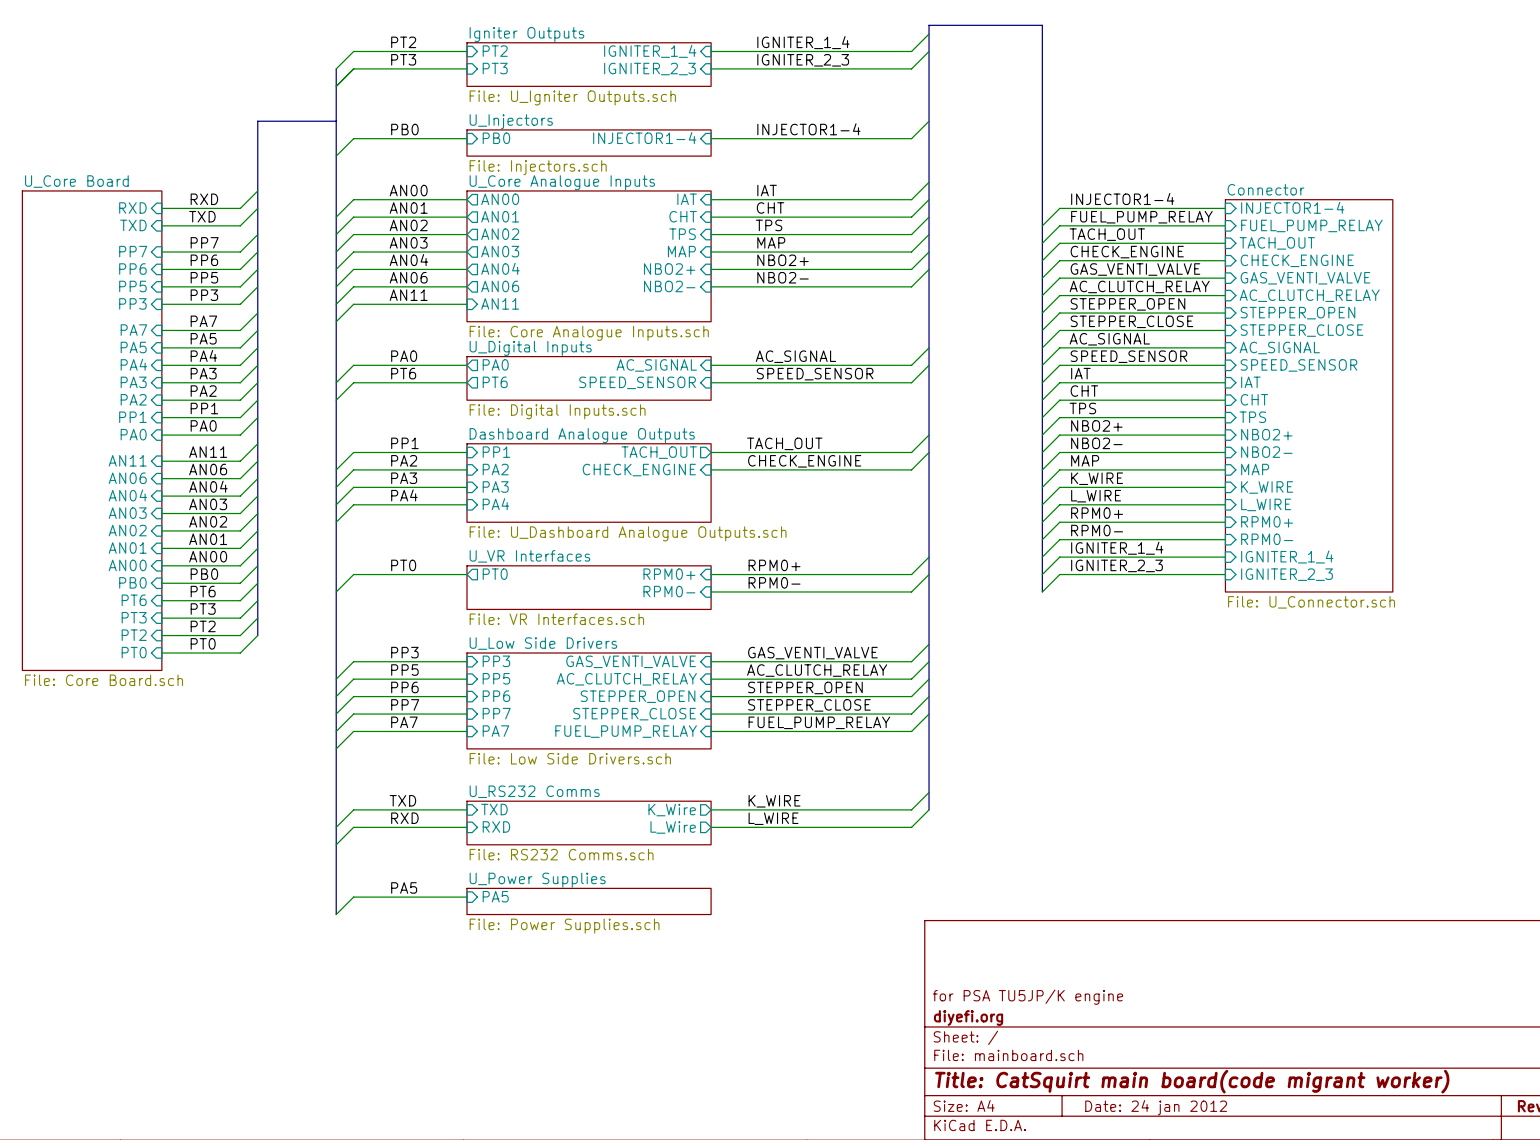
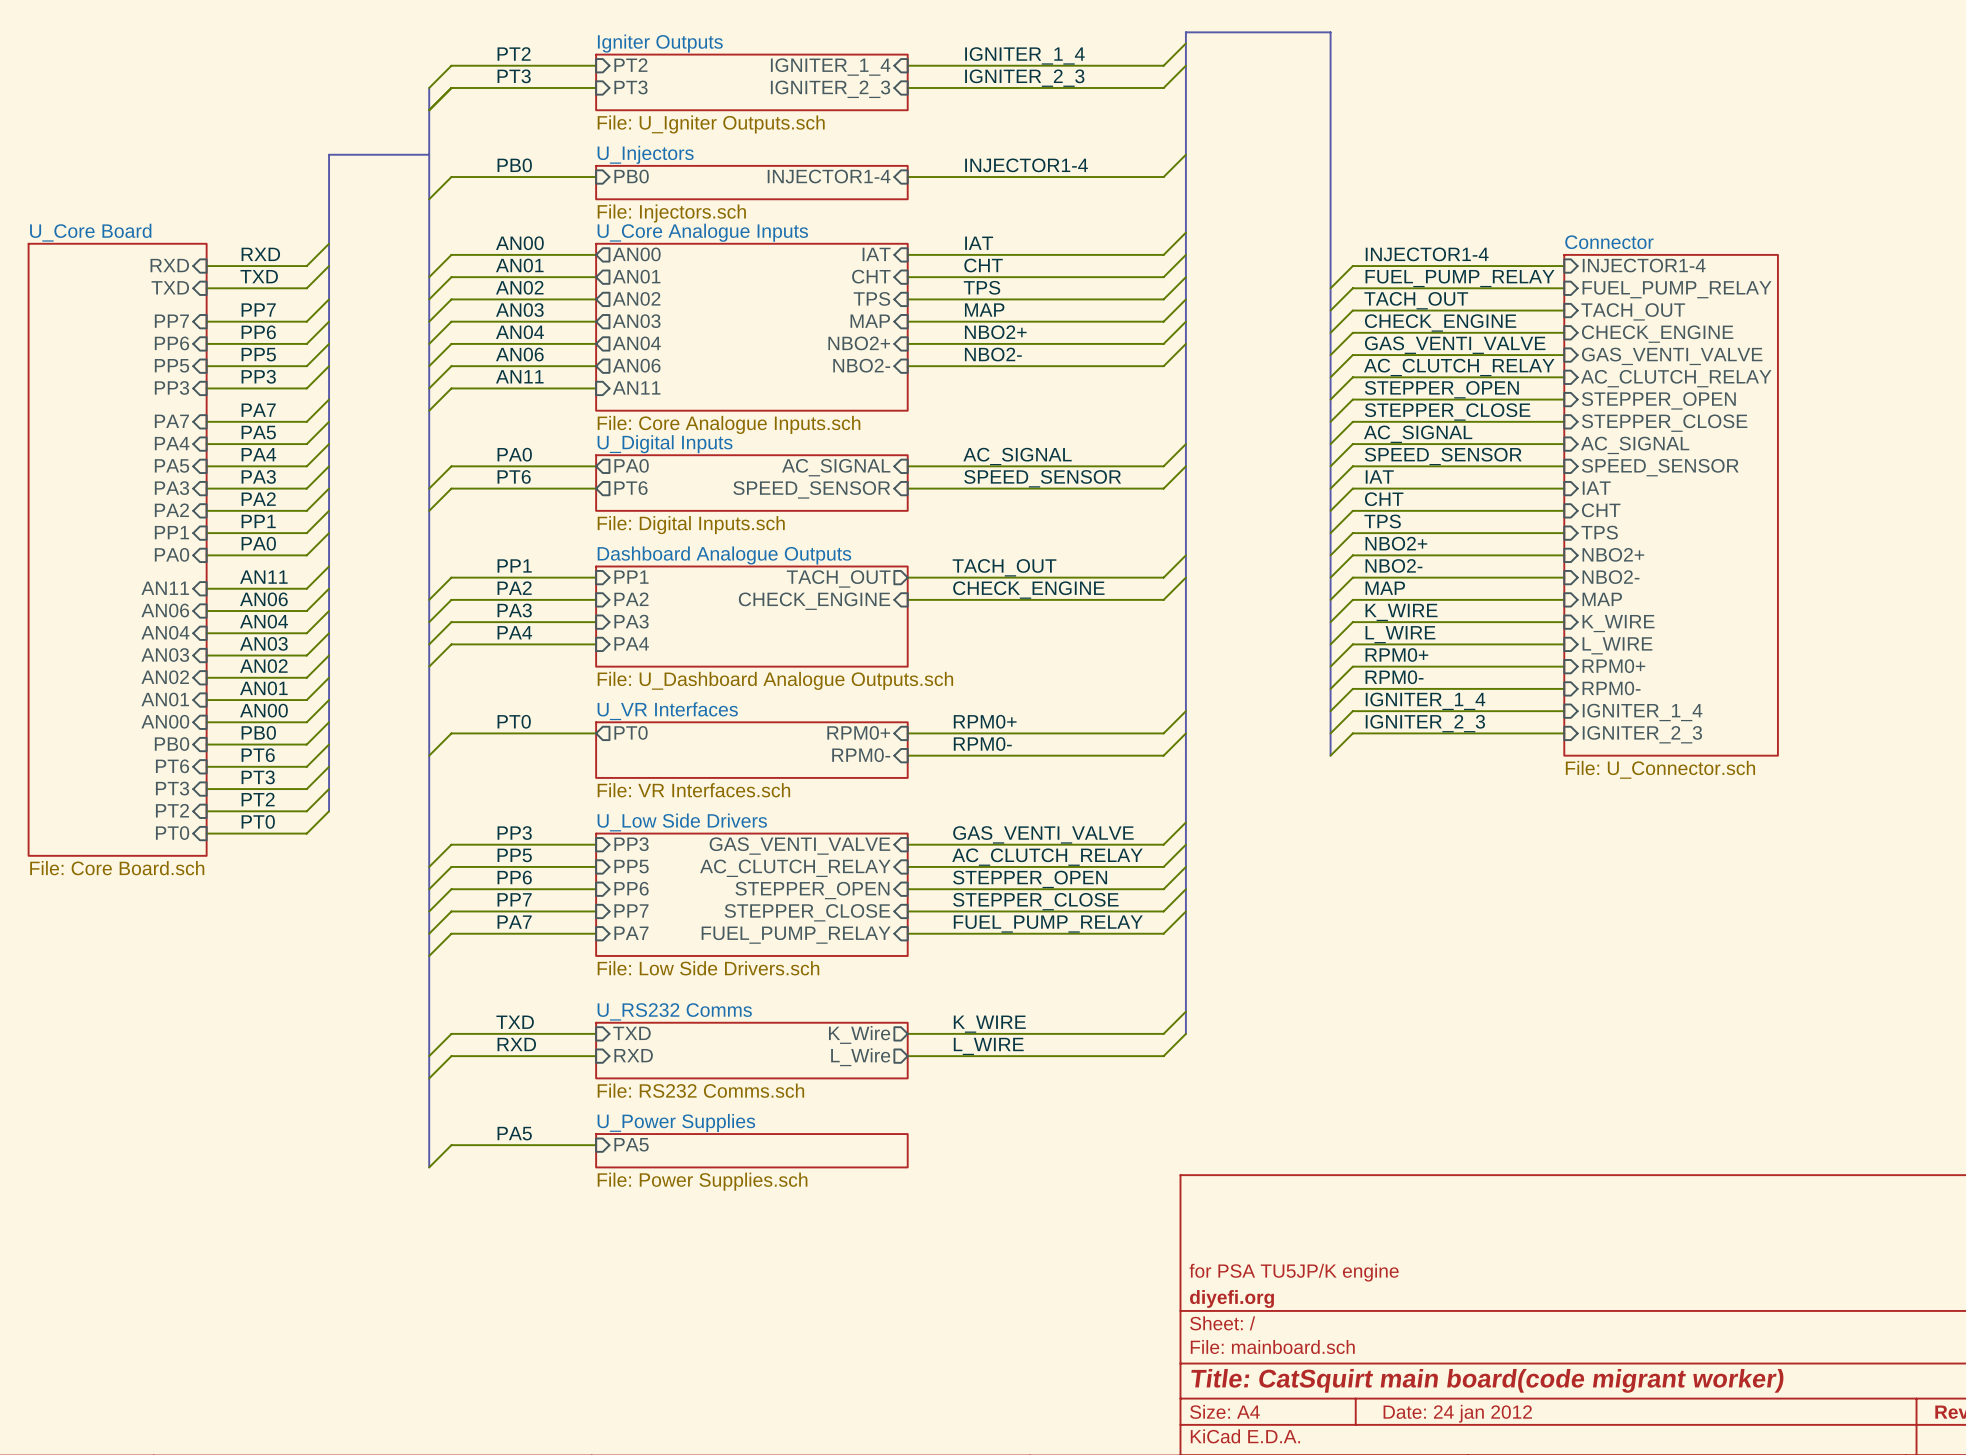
sheet pin: PA5 (133, 347) -> PA4 (172, 443)
sheet pin: PA4 (133, 364) -> PA5 (171, 465)

